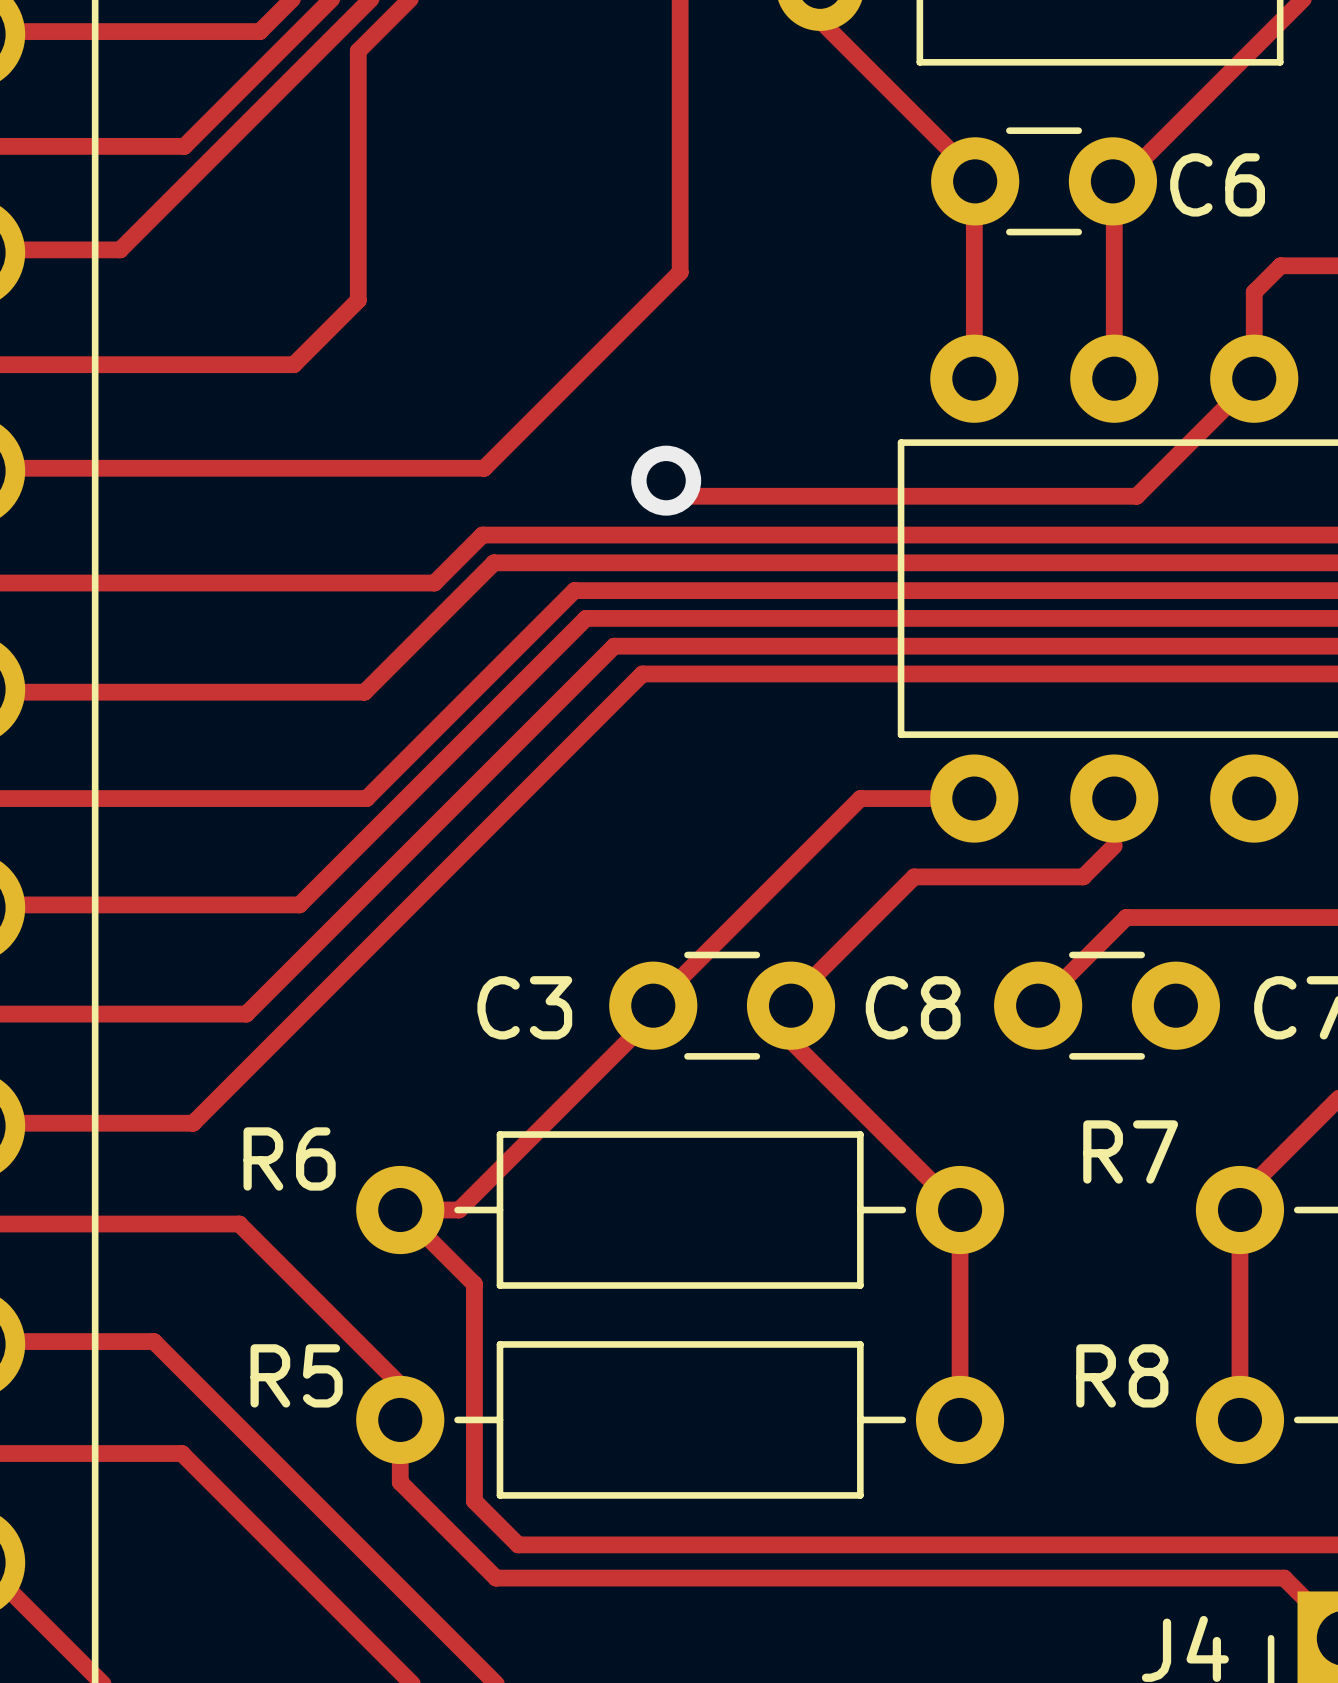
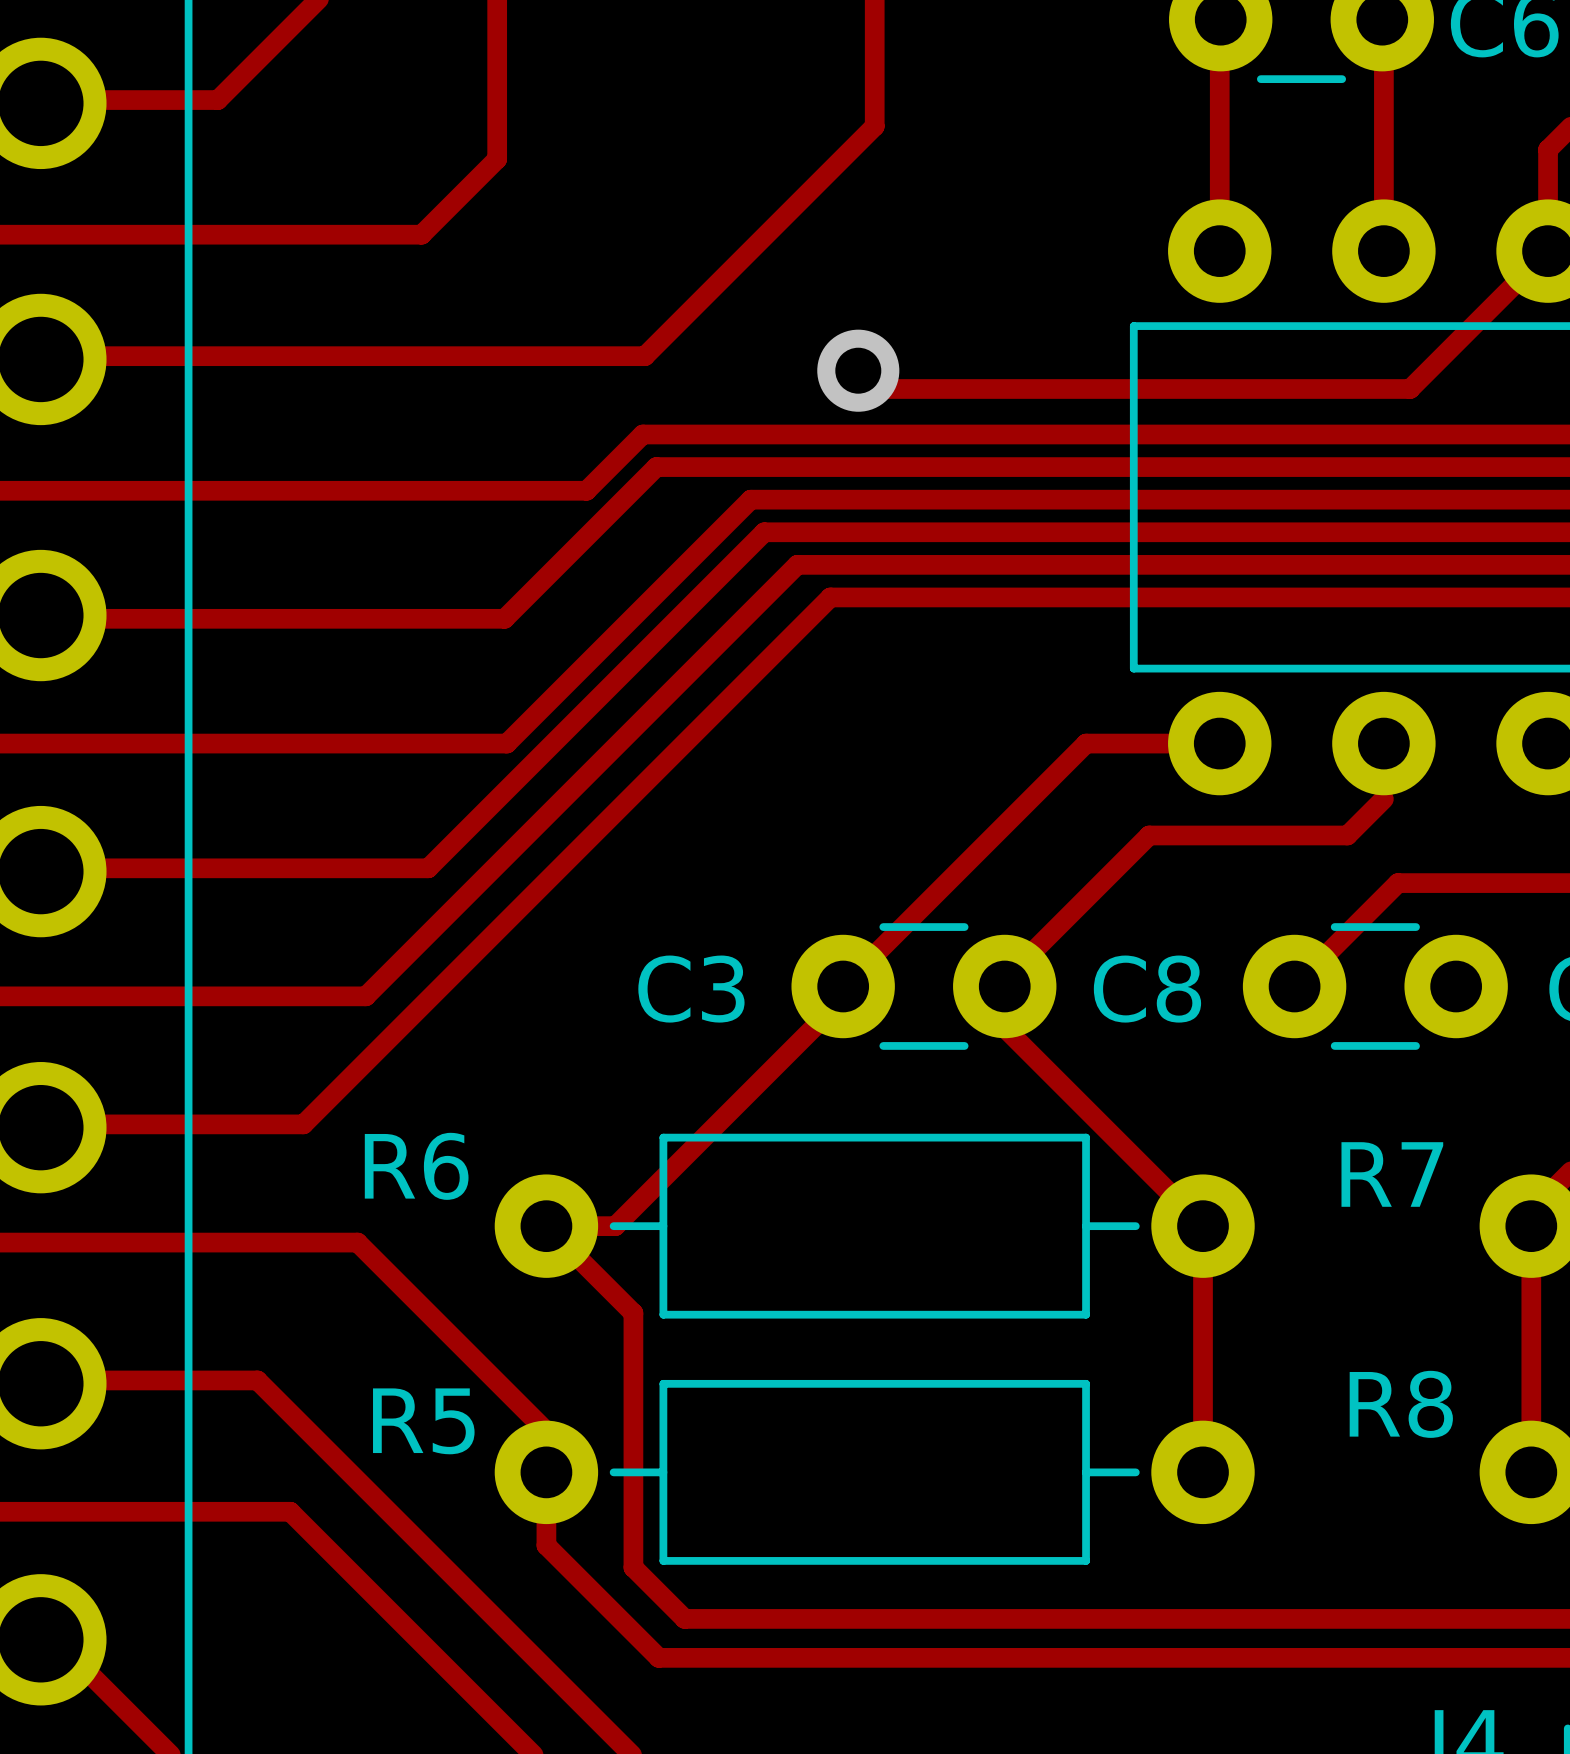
R7 name position: R7 (1130, 1151) -> R7 (1392, 1174)
R8 name position: R8 (1122, 1375) -> R8 (1401, 1404)

